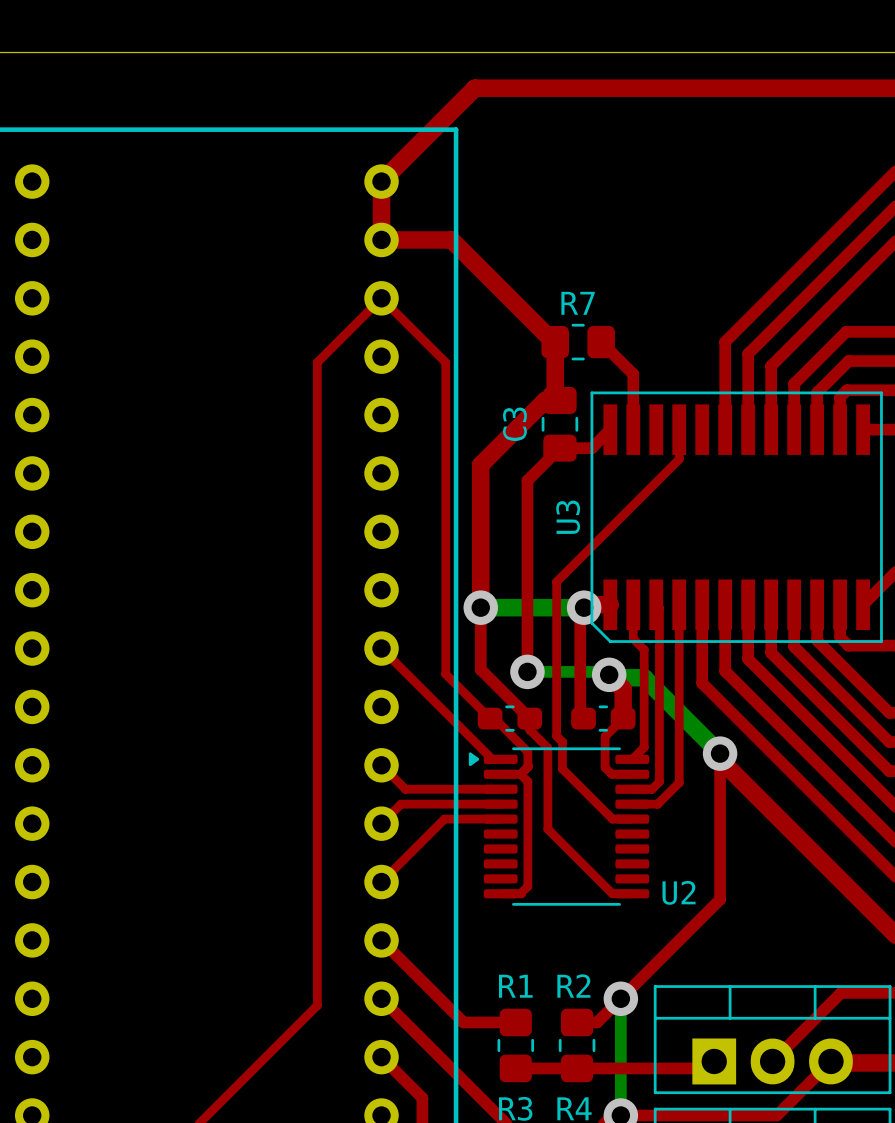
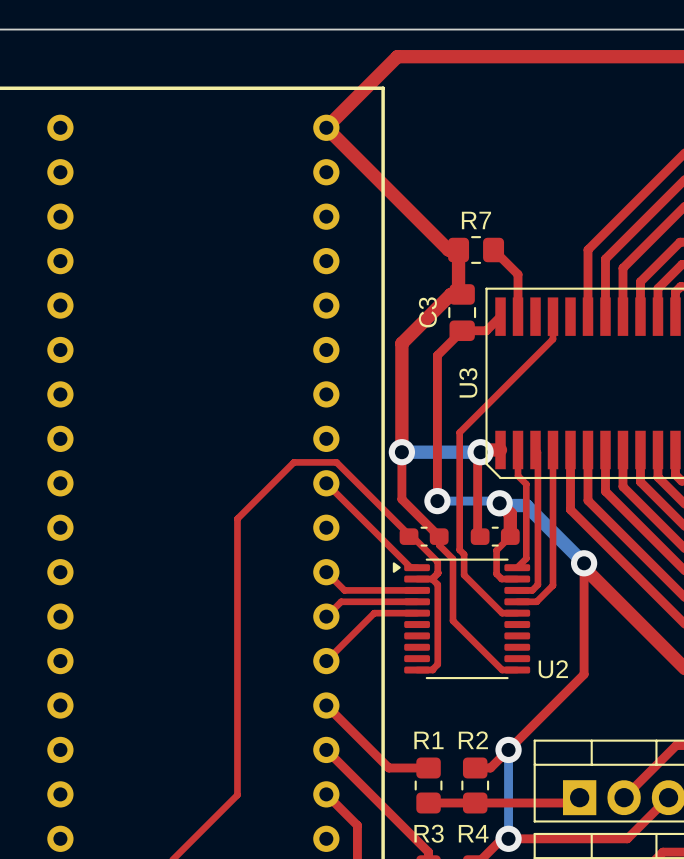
top track: (381, 181) (381, 239) (451, 239) (553, 342) -> (326, 127) (448, 250) (457, 250)
top track: (490, 718) (445, 674) (445, 362) (381, 298) (317, 362) (317, 1005) (264, 1058) -> (411, 537) (336, 462) (293, 462) (237, 518) (237, 795)

